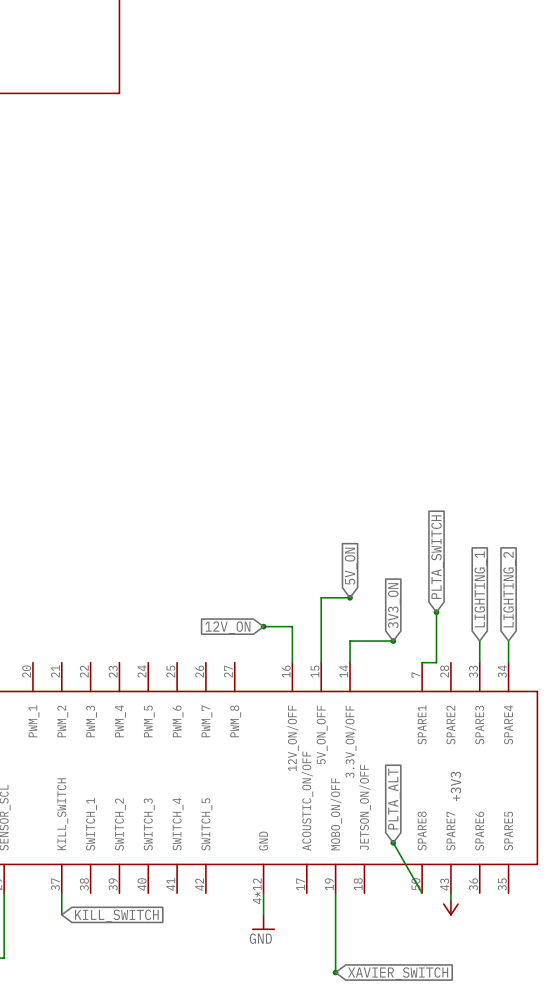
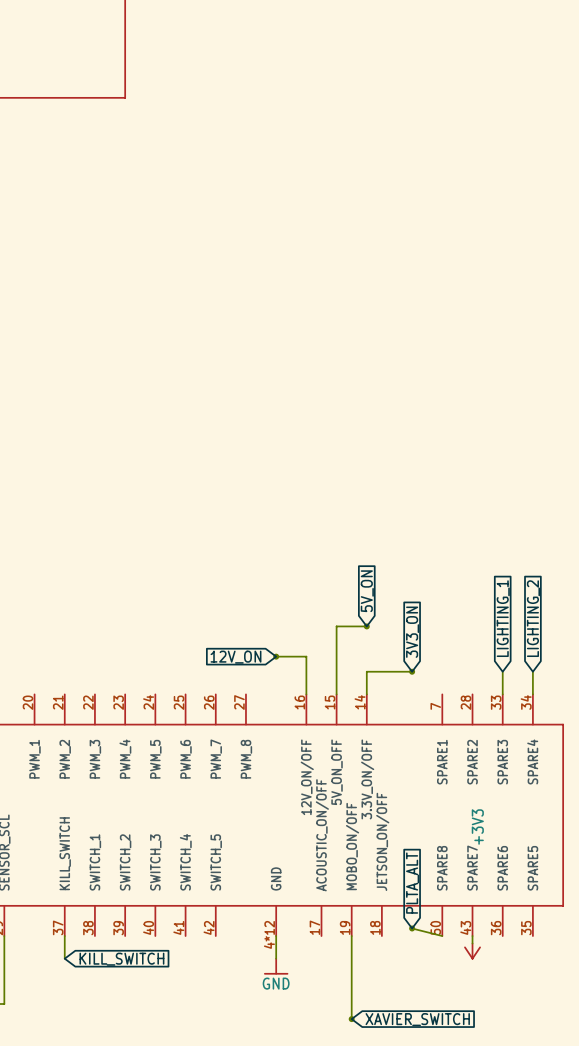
global label: PLTA_SWITCH (437, 557) -> none
wire: (436, 612) (436, 662) (422, 662) -> none
junction: (436, 612) -> none
global label position: PLTA_ALT (394, 799) -> PLTA_ALT (412, 883)
wire: (393, 842) (422, 893) -> (412, 928) (442, 936)
junction: (393, 842) -> none
junction: none -> (412, 928)

